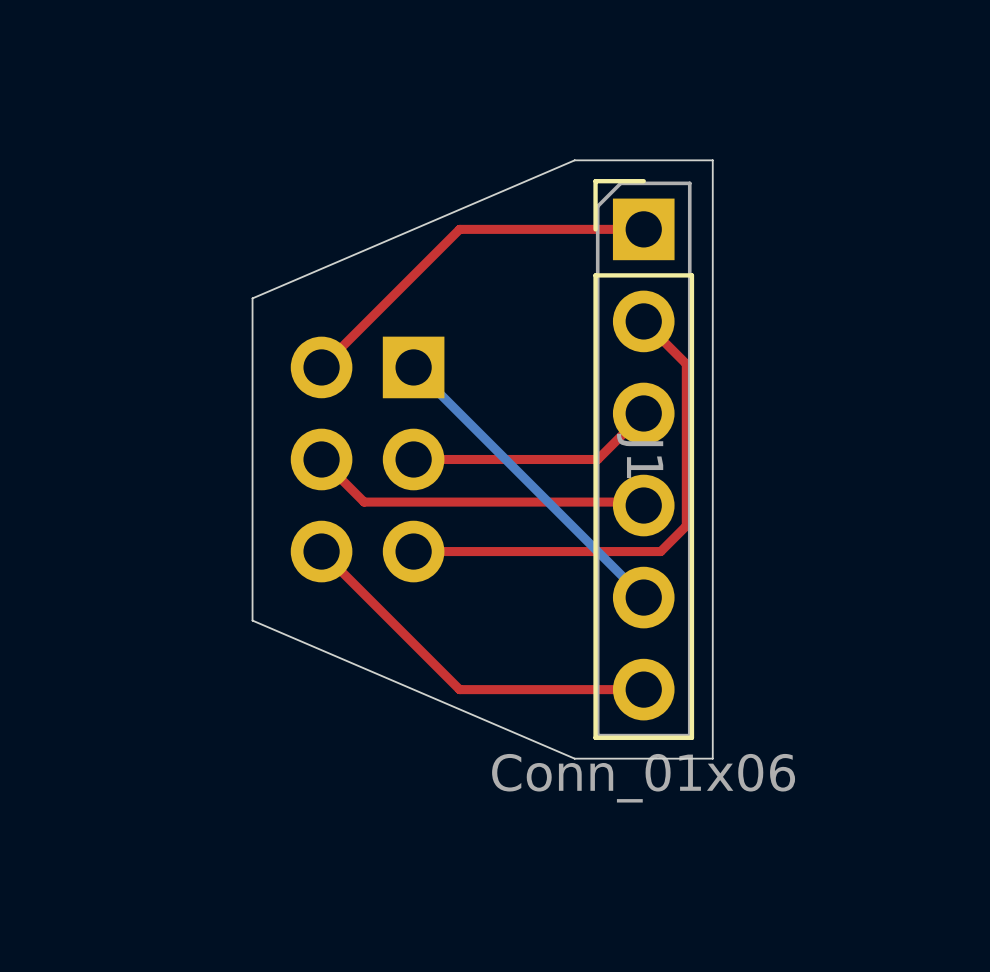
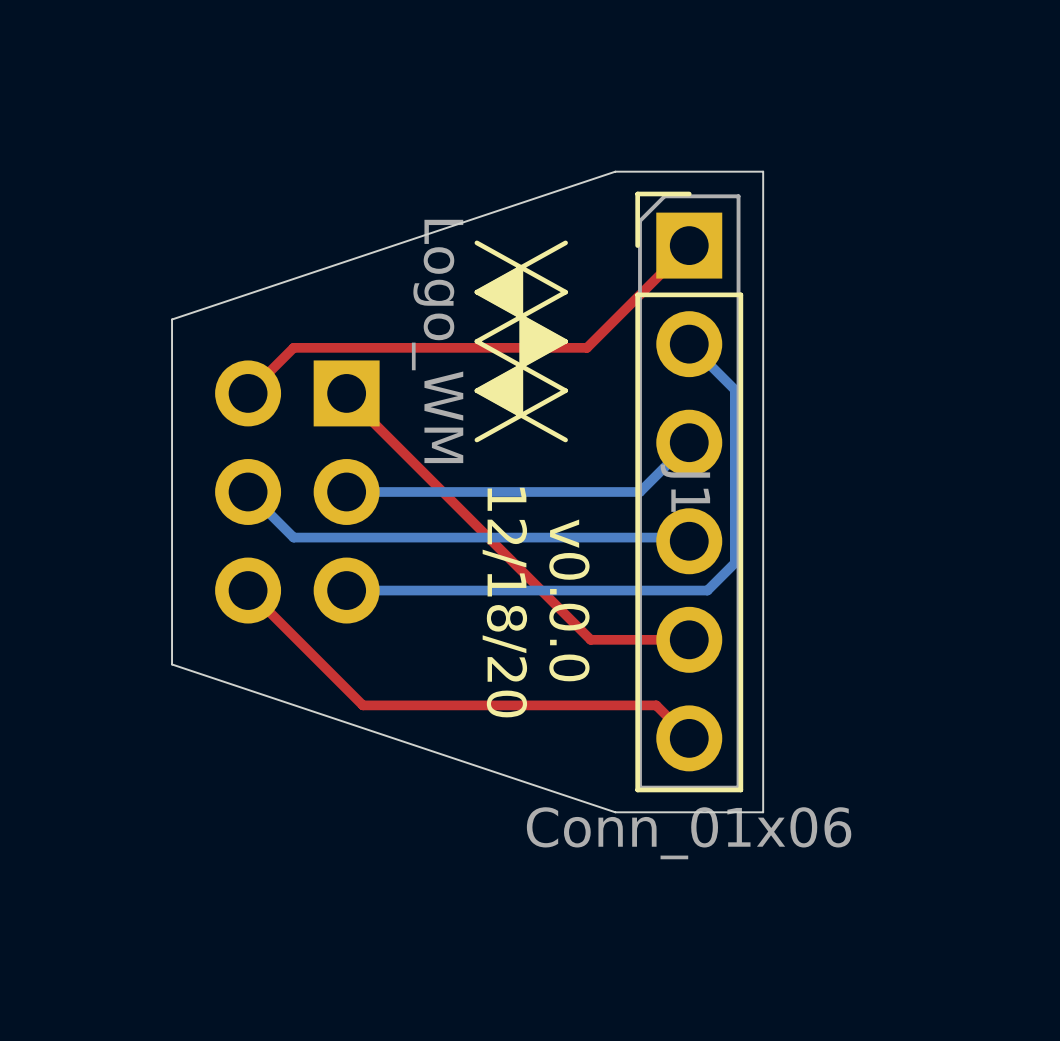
board edge: (574, 160) (252, 298) (252, 620) (574, 758) -> (615, 171) (172, 319) (172, 664) (615, 812)
drawing: none -> [474, 240, 568, 443]
top track: (643, 229) (459, 229) (321, 367) -> (689, 245) (587, 347) (293, 347) (248, 393)
top track: (643, 321) (686, 364) (686, 525) (660, 551) (413, 551) -> none
bottom track: none -> (689, 344) (734, 389) (734, 563) (707, 590) (346, 590)
top track: none -> (346, 393) (346, 395) (590, 639) (689, 639)
bottom track: (413, 367) (643, 597) -> none
top track: (643, 413) (597, 459) (413, 459) -> none
bottom track: none -> (689, 442) (639, 491) (346, 491)
bottom track: none -> (248, 491) (293, 537) (685, 537) (689, 541)
top track: (321, 459) (364, 502) (640, 502) -> none
part position: (367, 459) -> (297, 491)
top track: (321, 551) (459, 689) (643, 689) -> (248, 590) (362, 705) (656, 705) (689, 738)
text: none -> v0.0.0 (569, 600)
text: none -> 12/18/20 (504, 602)

